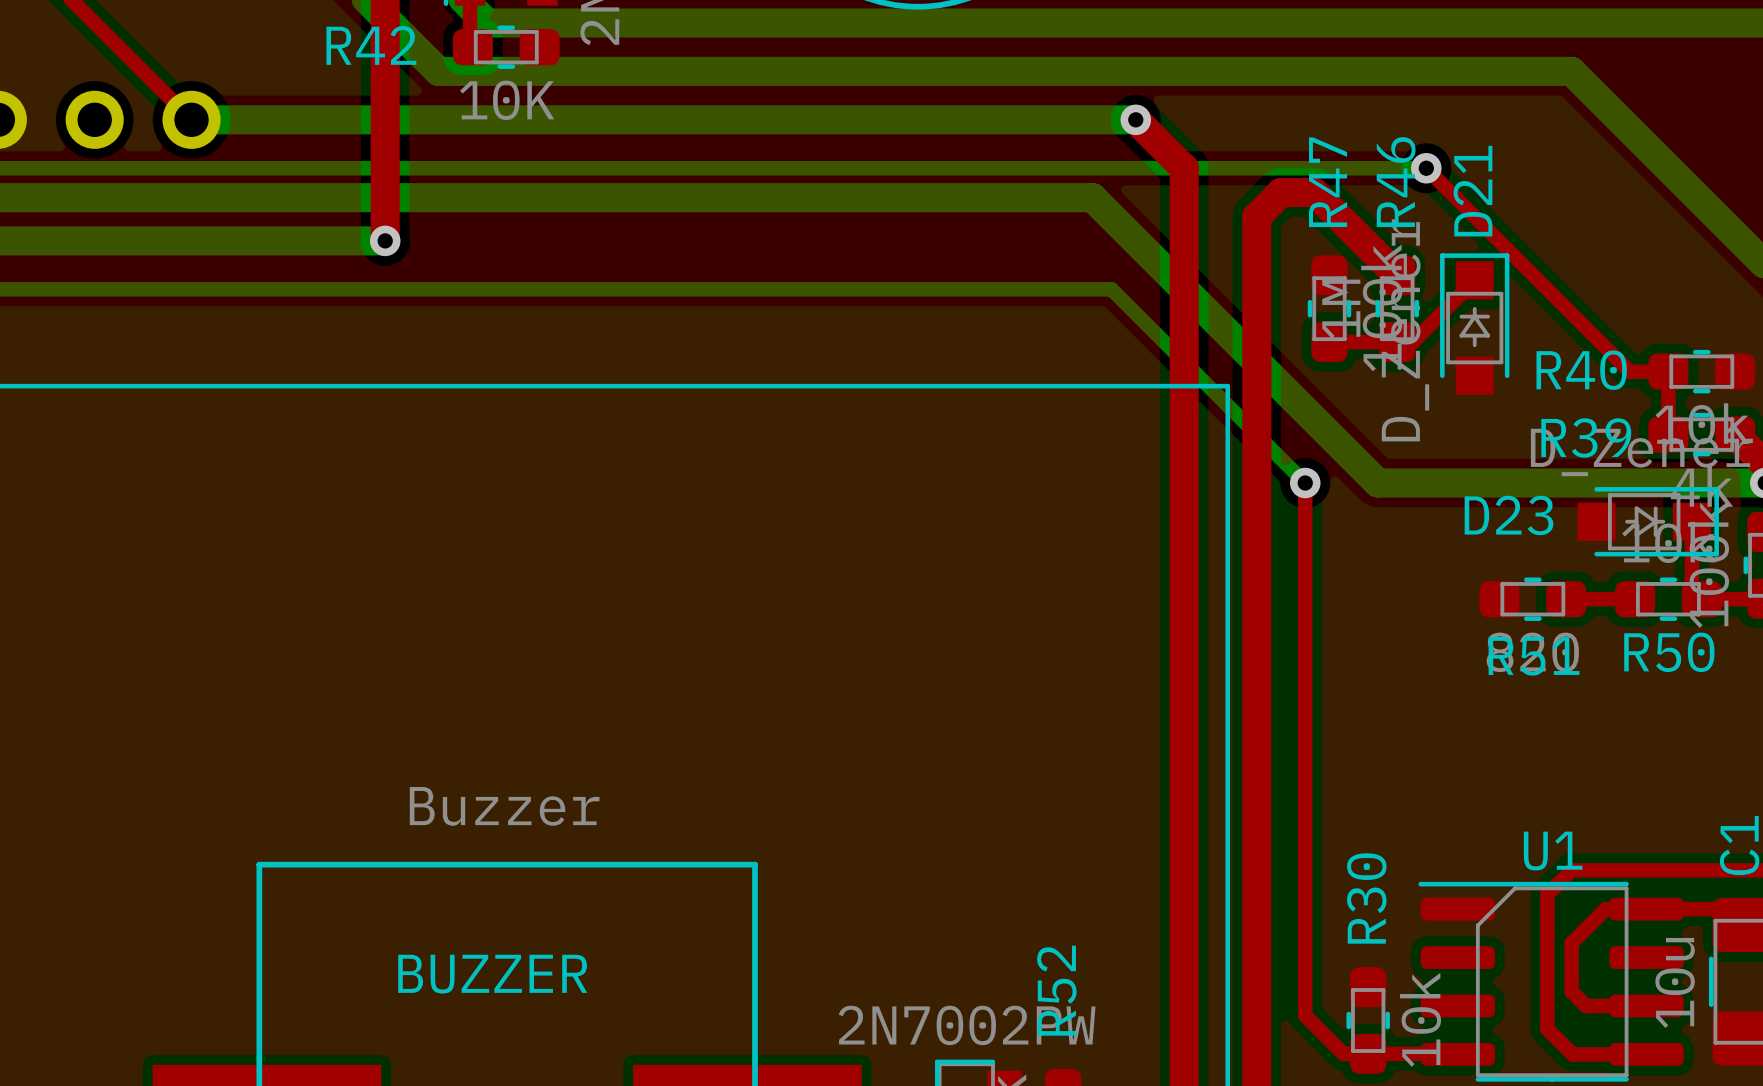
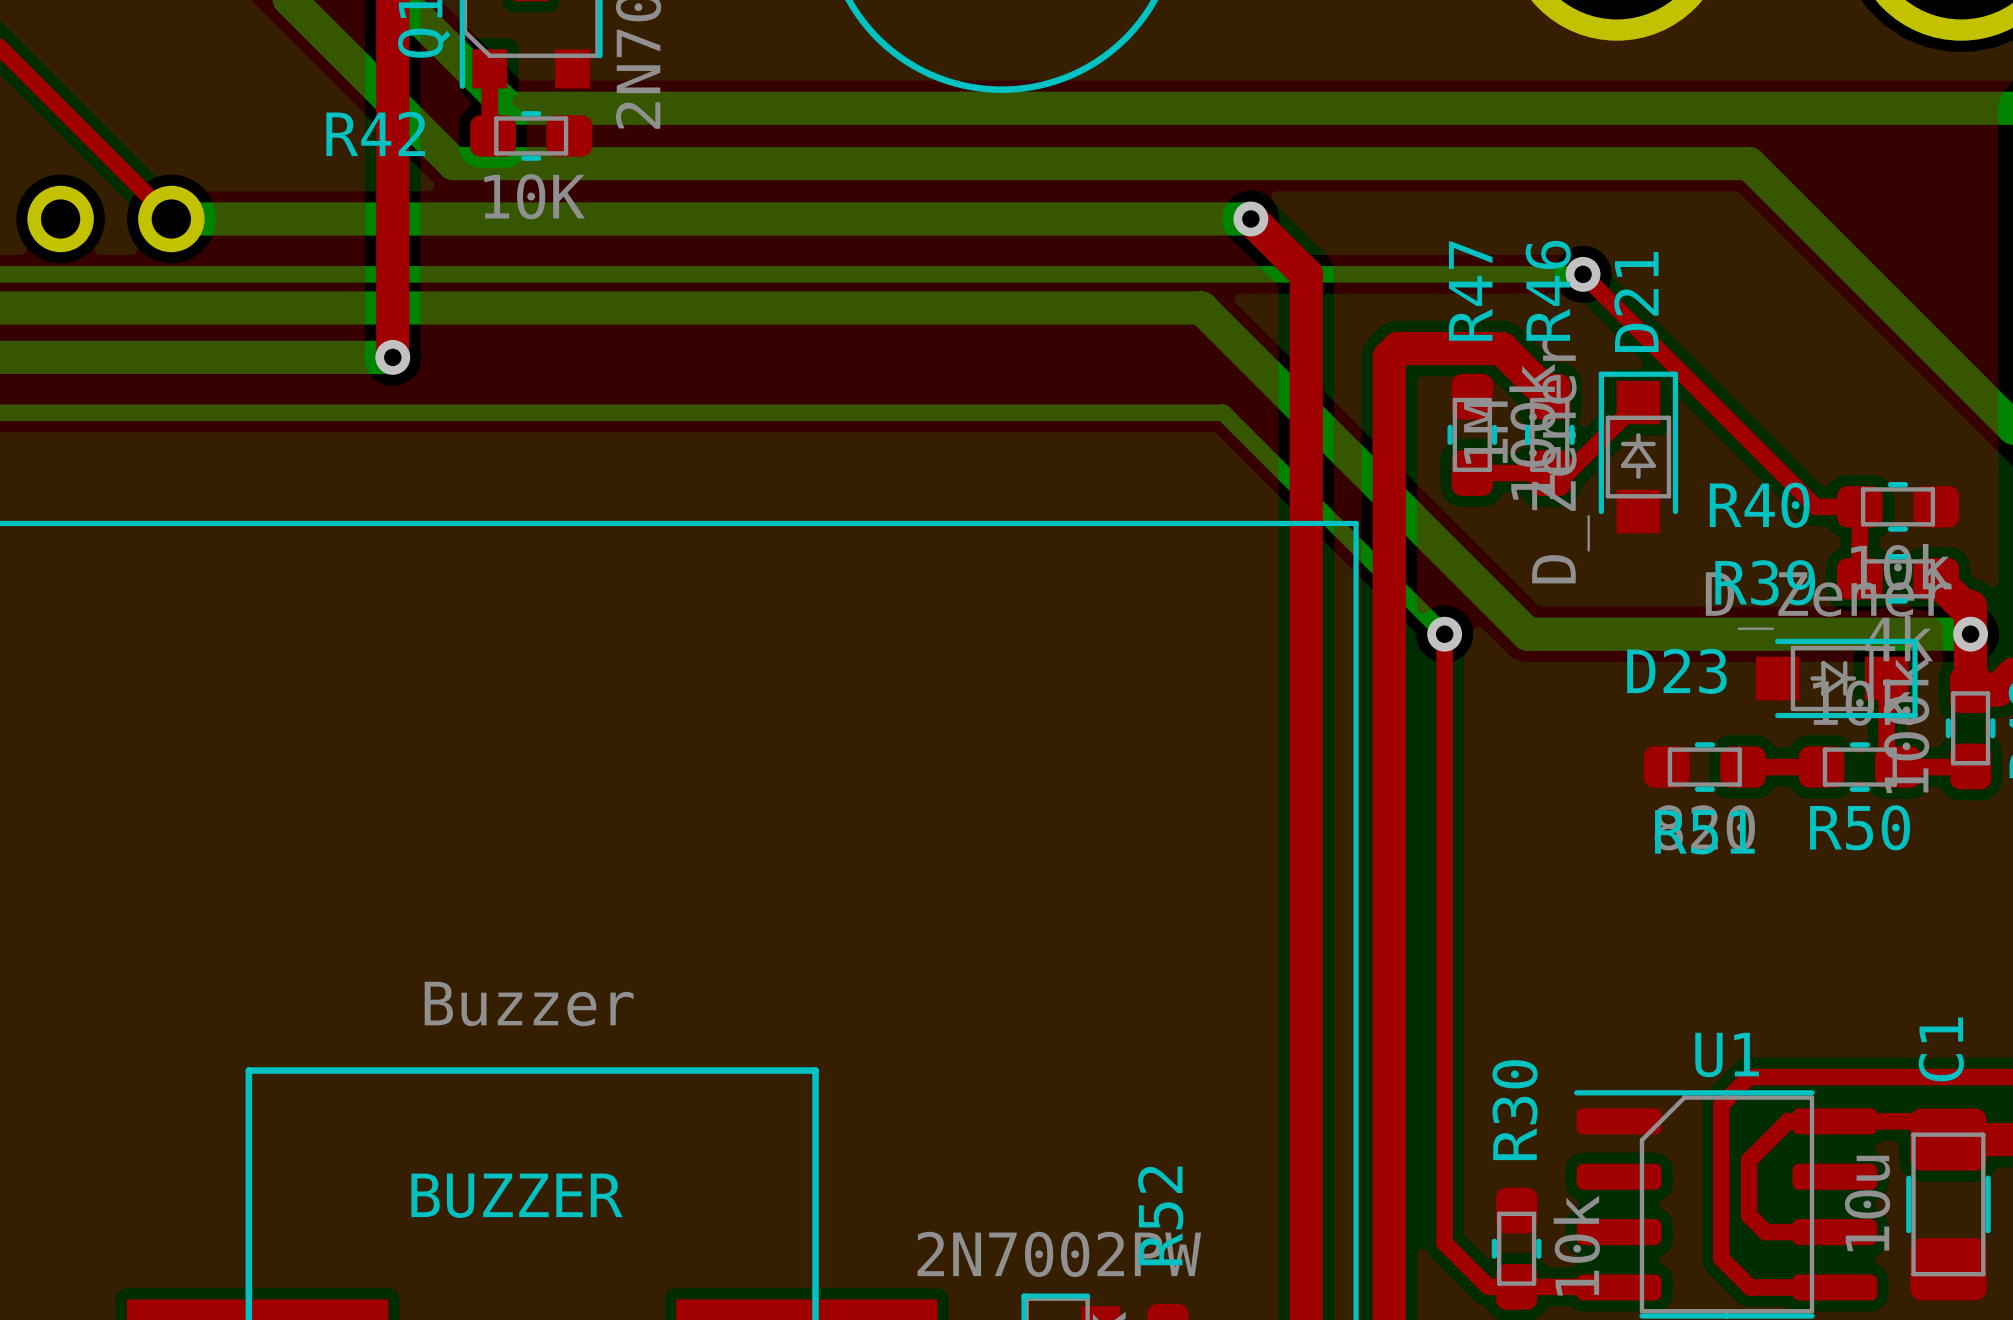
top track: (1355, 233) (1314, 192) (1281, 192) (1256, 216) (1256, 240) -> (1501, 348) (1398, 348) (1389, 357)

